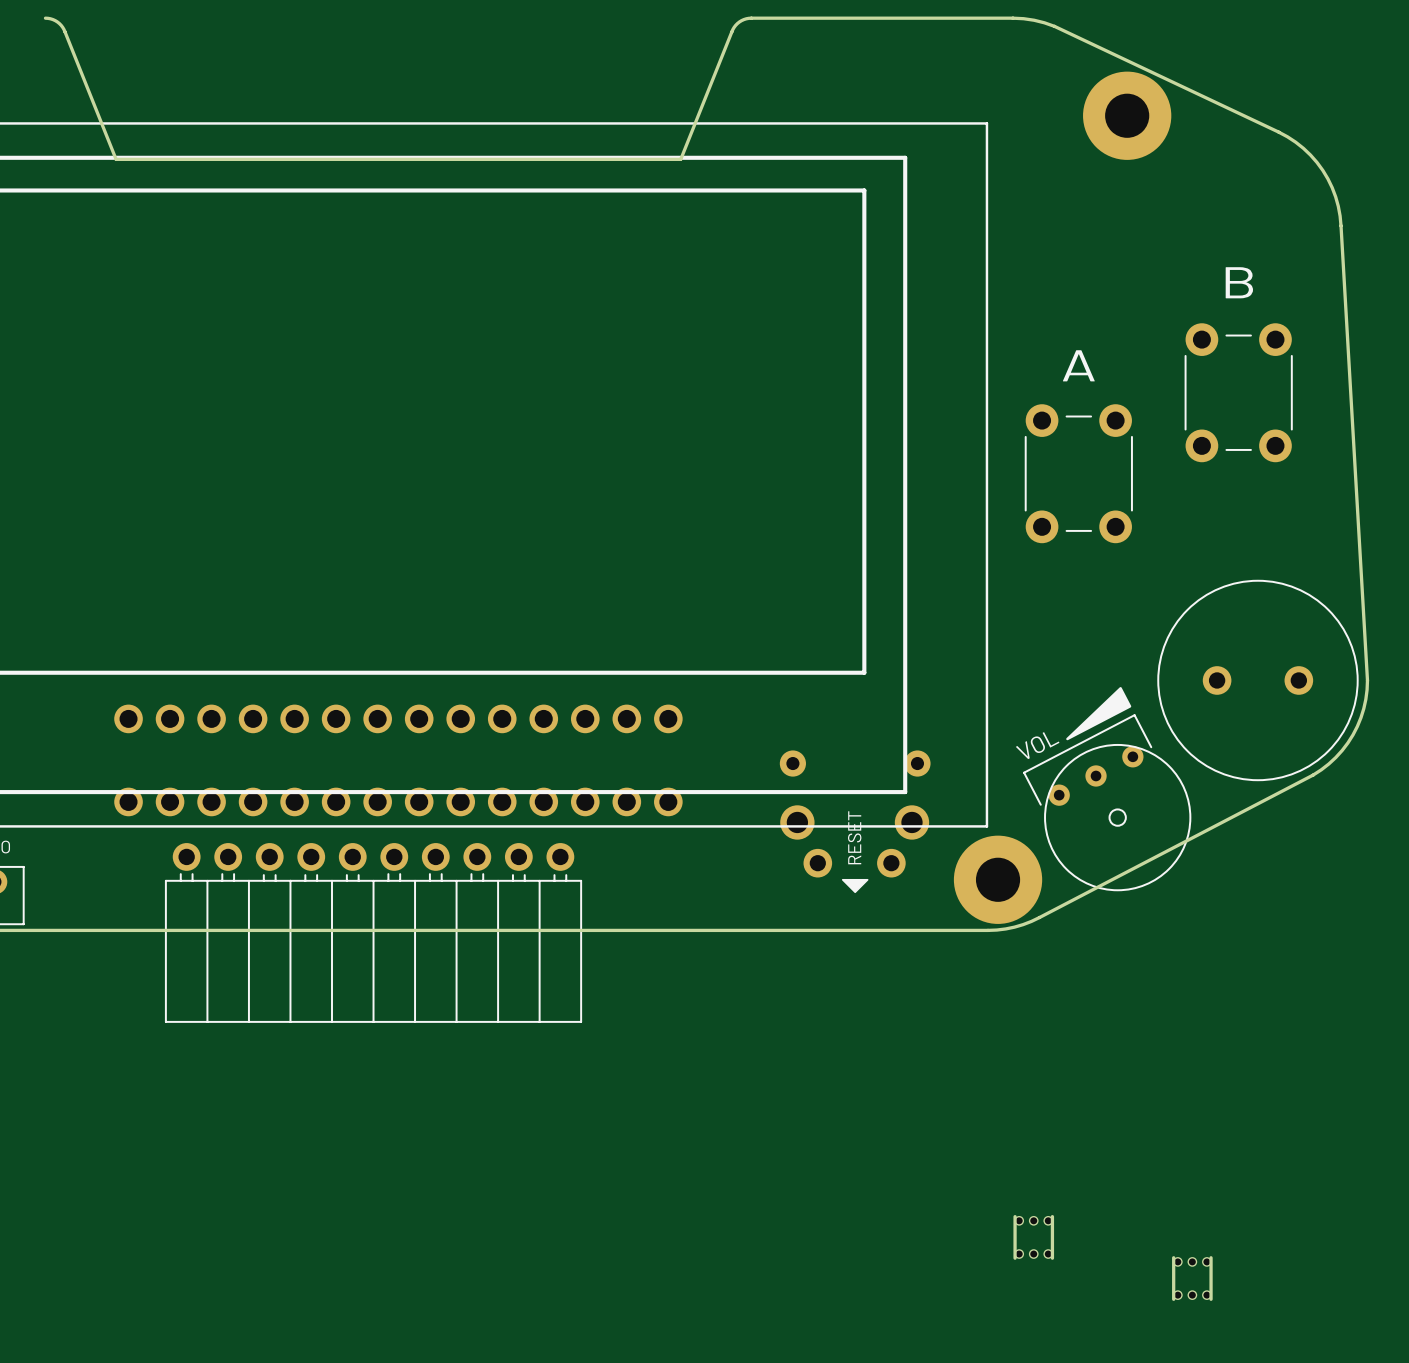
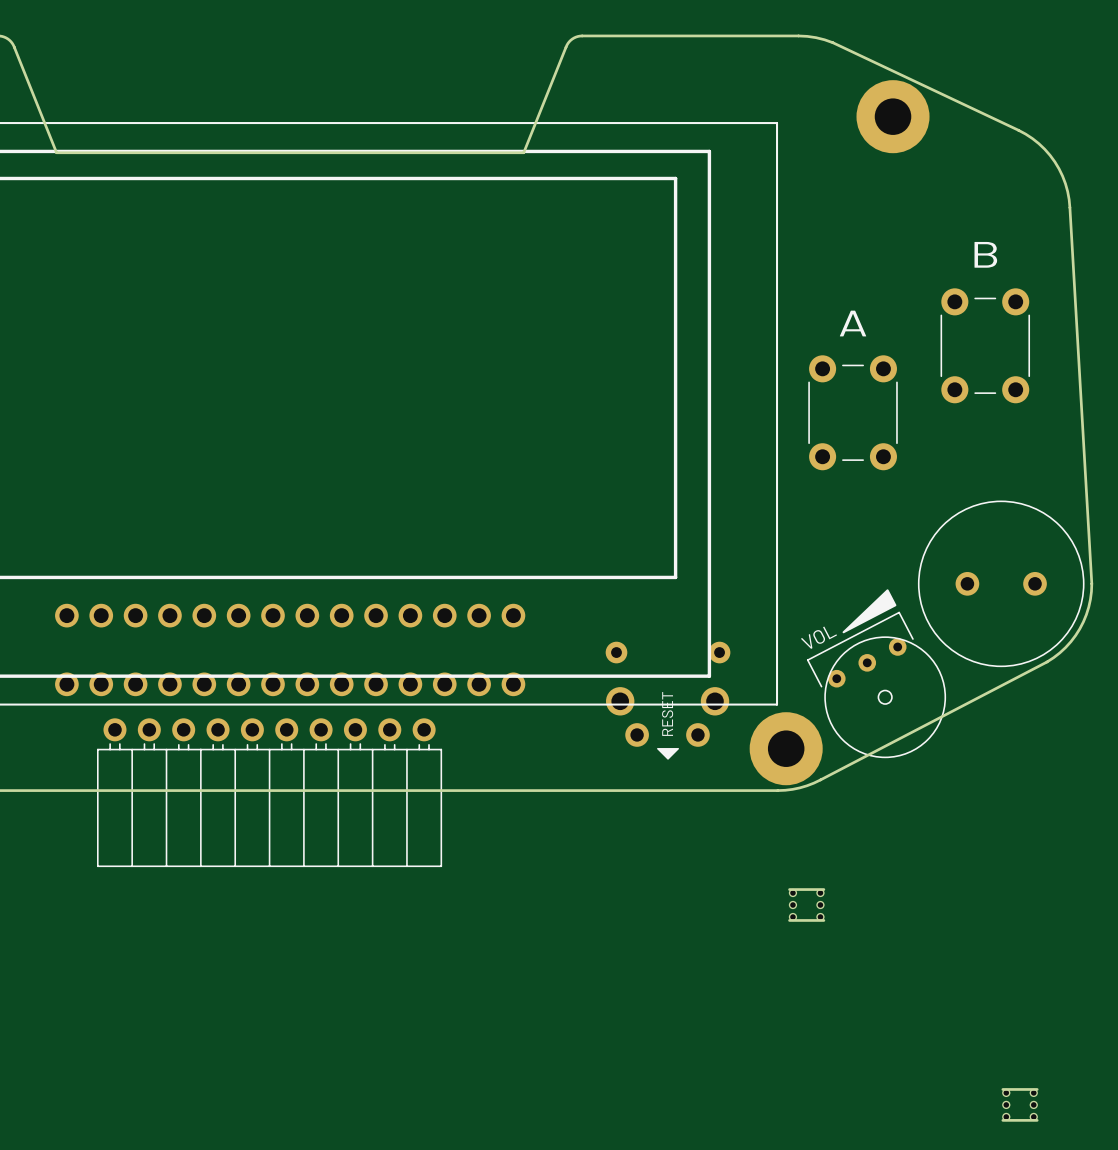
board edge: none -> (789, 889) (823, 889)
part: none -> (806, 905)
board edge: none -> (789, 920) (823, 920)
board edge: (1015, 1216) (1015, 1258) -> none
board edge: (1052, 1216) (1052, 1258) -> none
part: (1033, 1237) -> none
board edge: (1173, 1257) (1173, 1299) -> none
board edge: (1211, 1257) (1211, 1299) -> none
part rotation: 0° (1192, 1278) -> 90° clockwise (1020, 1104)
part position: (1192, 1278) -> (1020, 1104)
board edge: none -> (1002, 1089) (1037, 1089)
board edge: none -> (1002, 1120) (1037, 1120)

